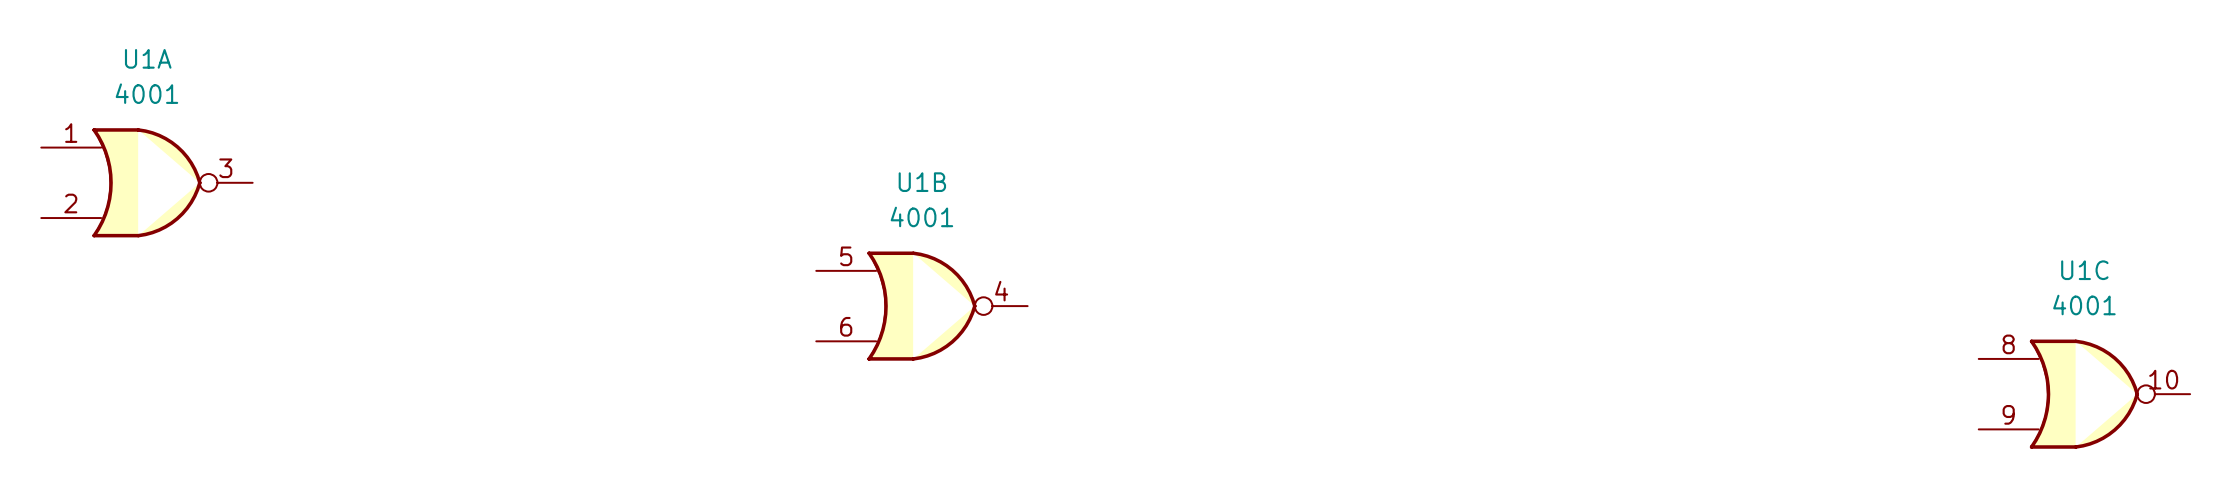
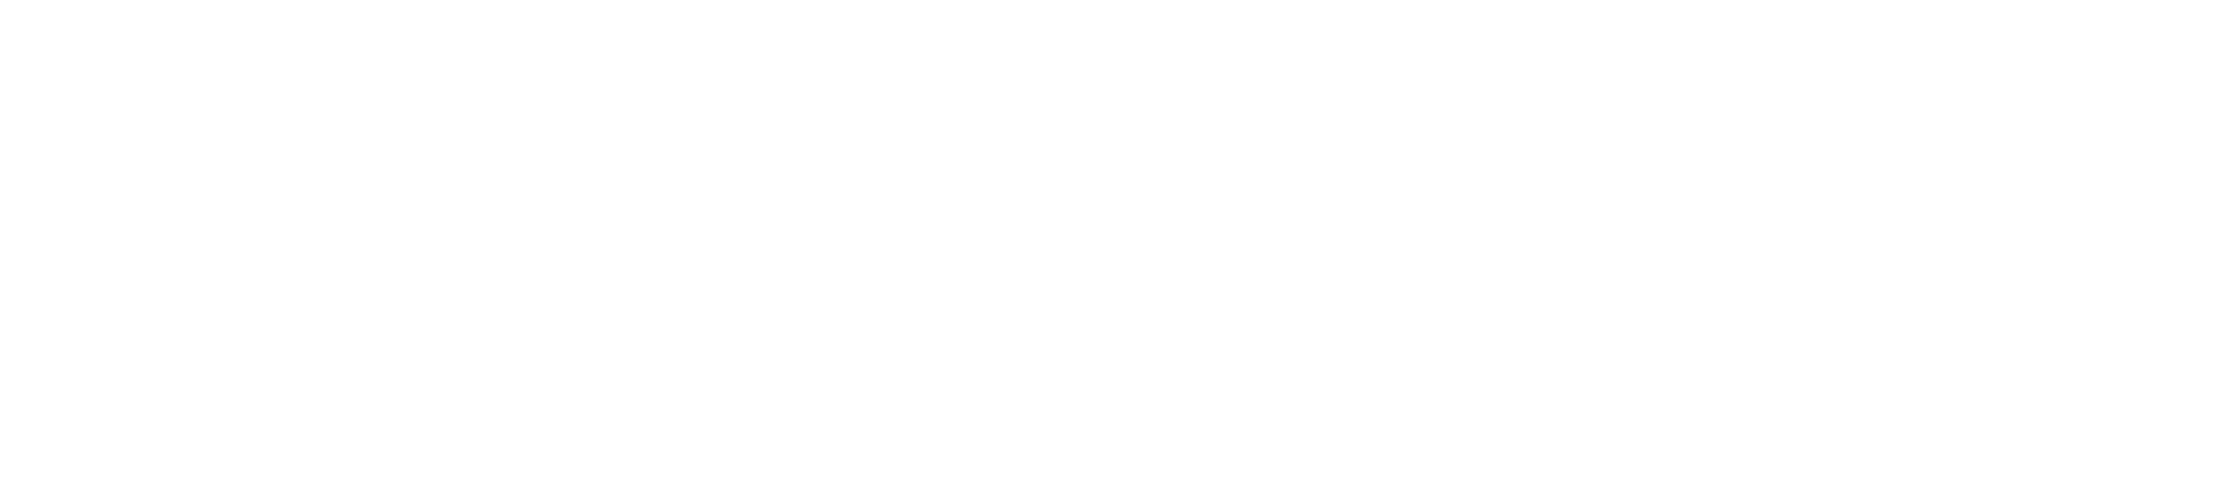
U1A: 4001 (146, 182) -> none
U1B: 4001 (921, 306) -> none
U1C: 4001 (2084, 394) -> none

